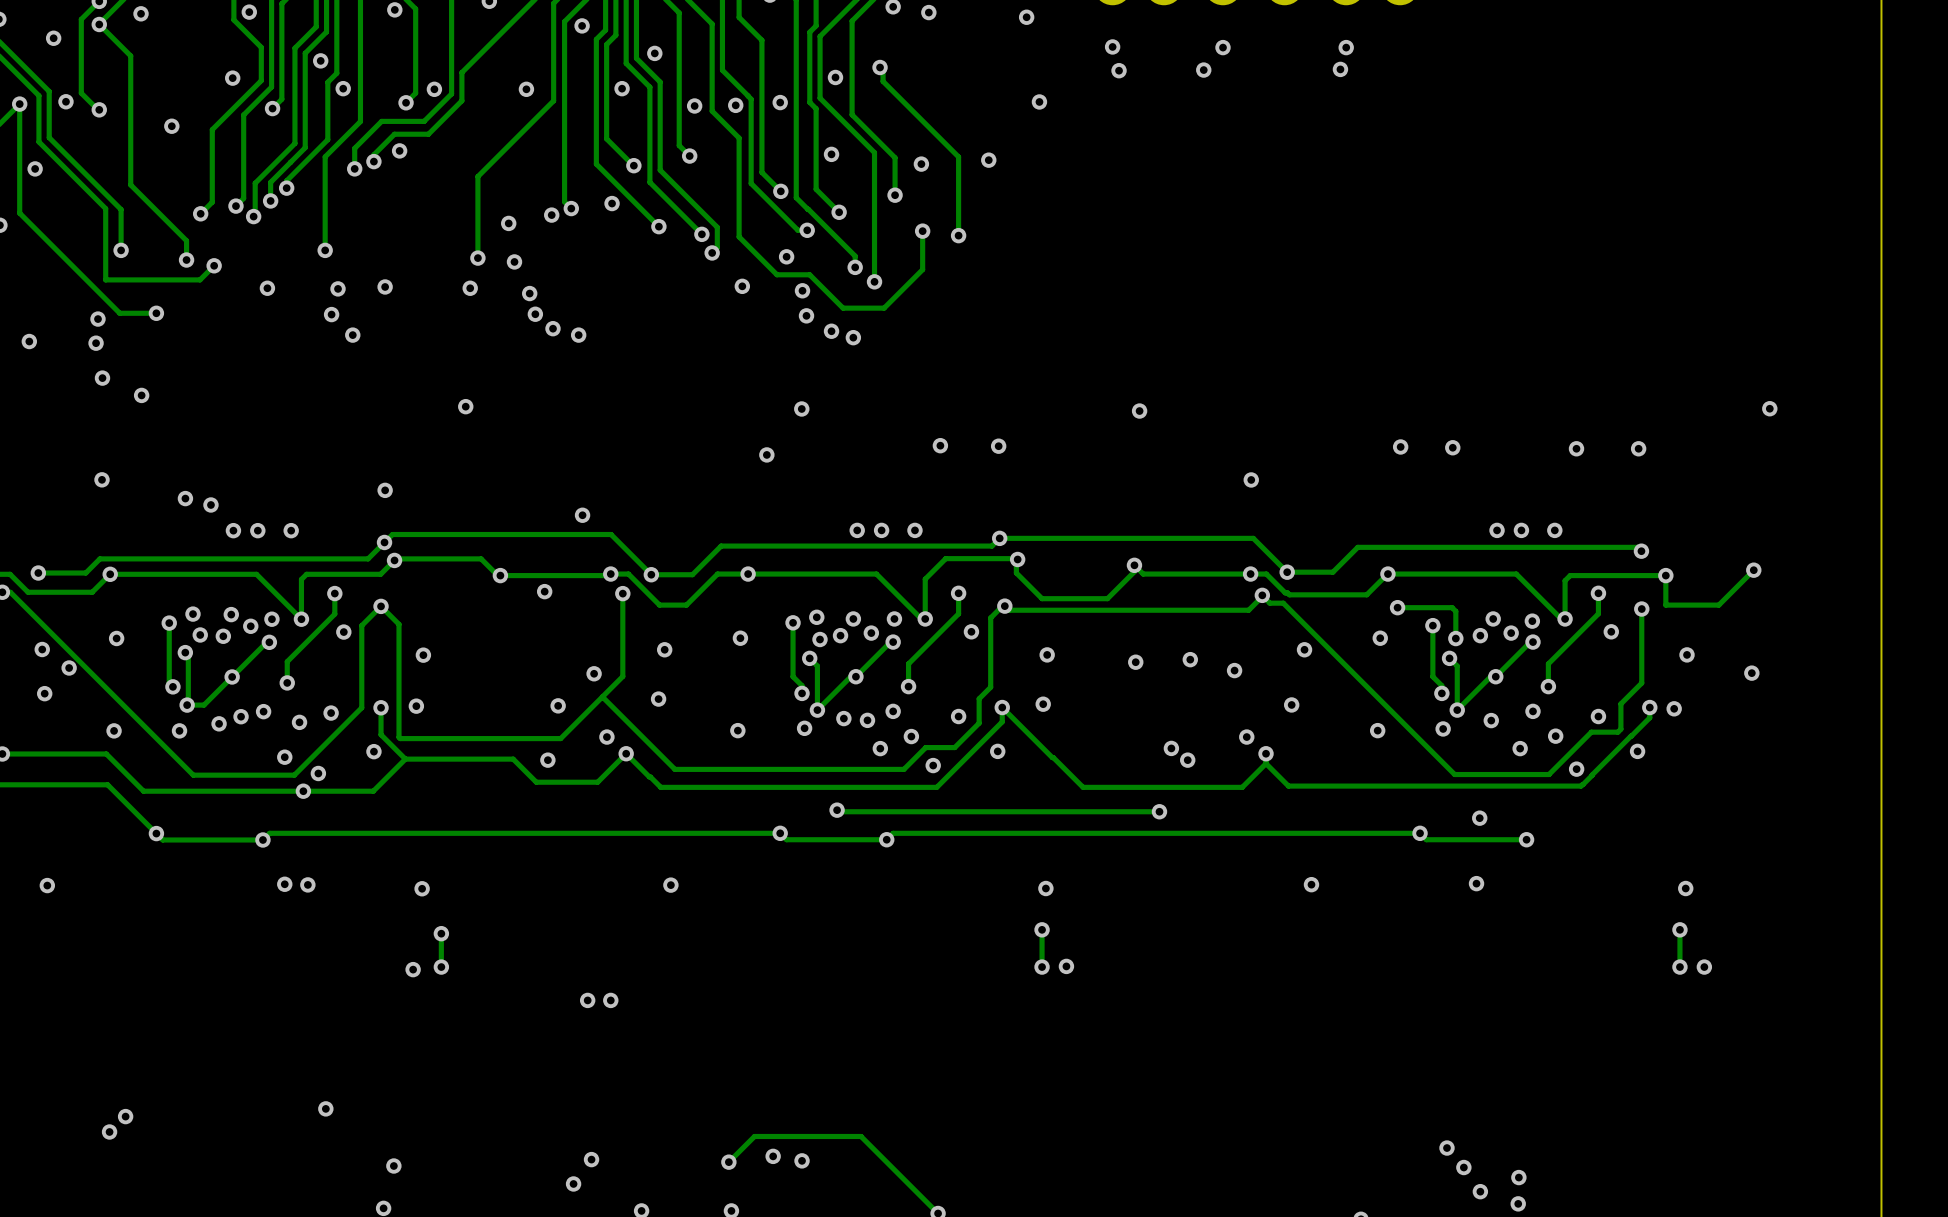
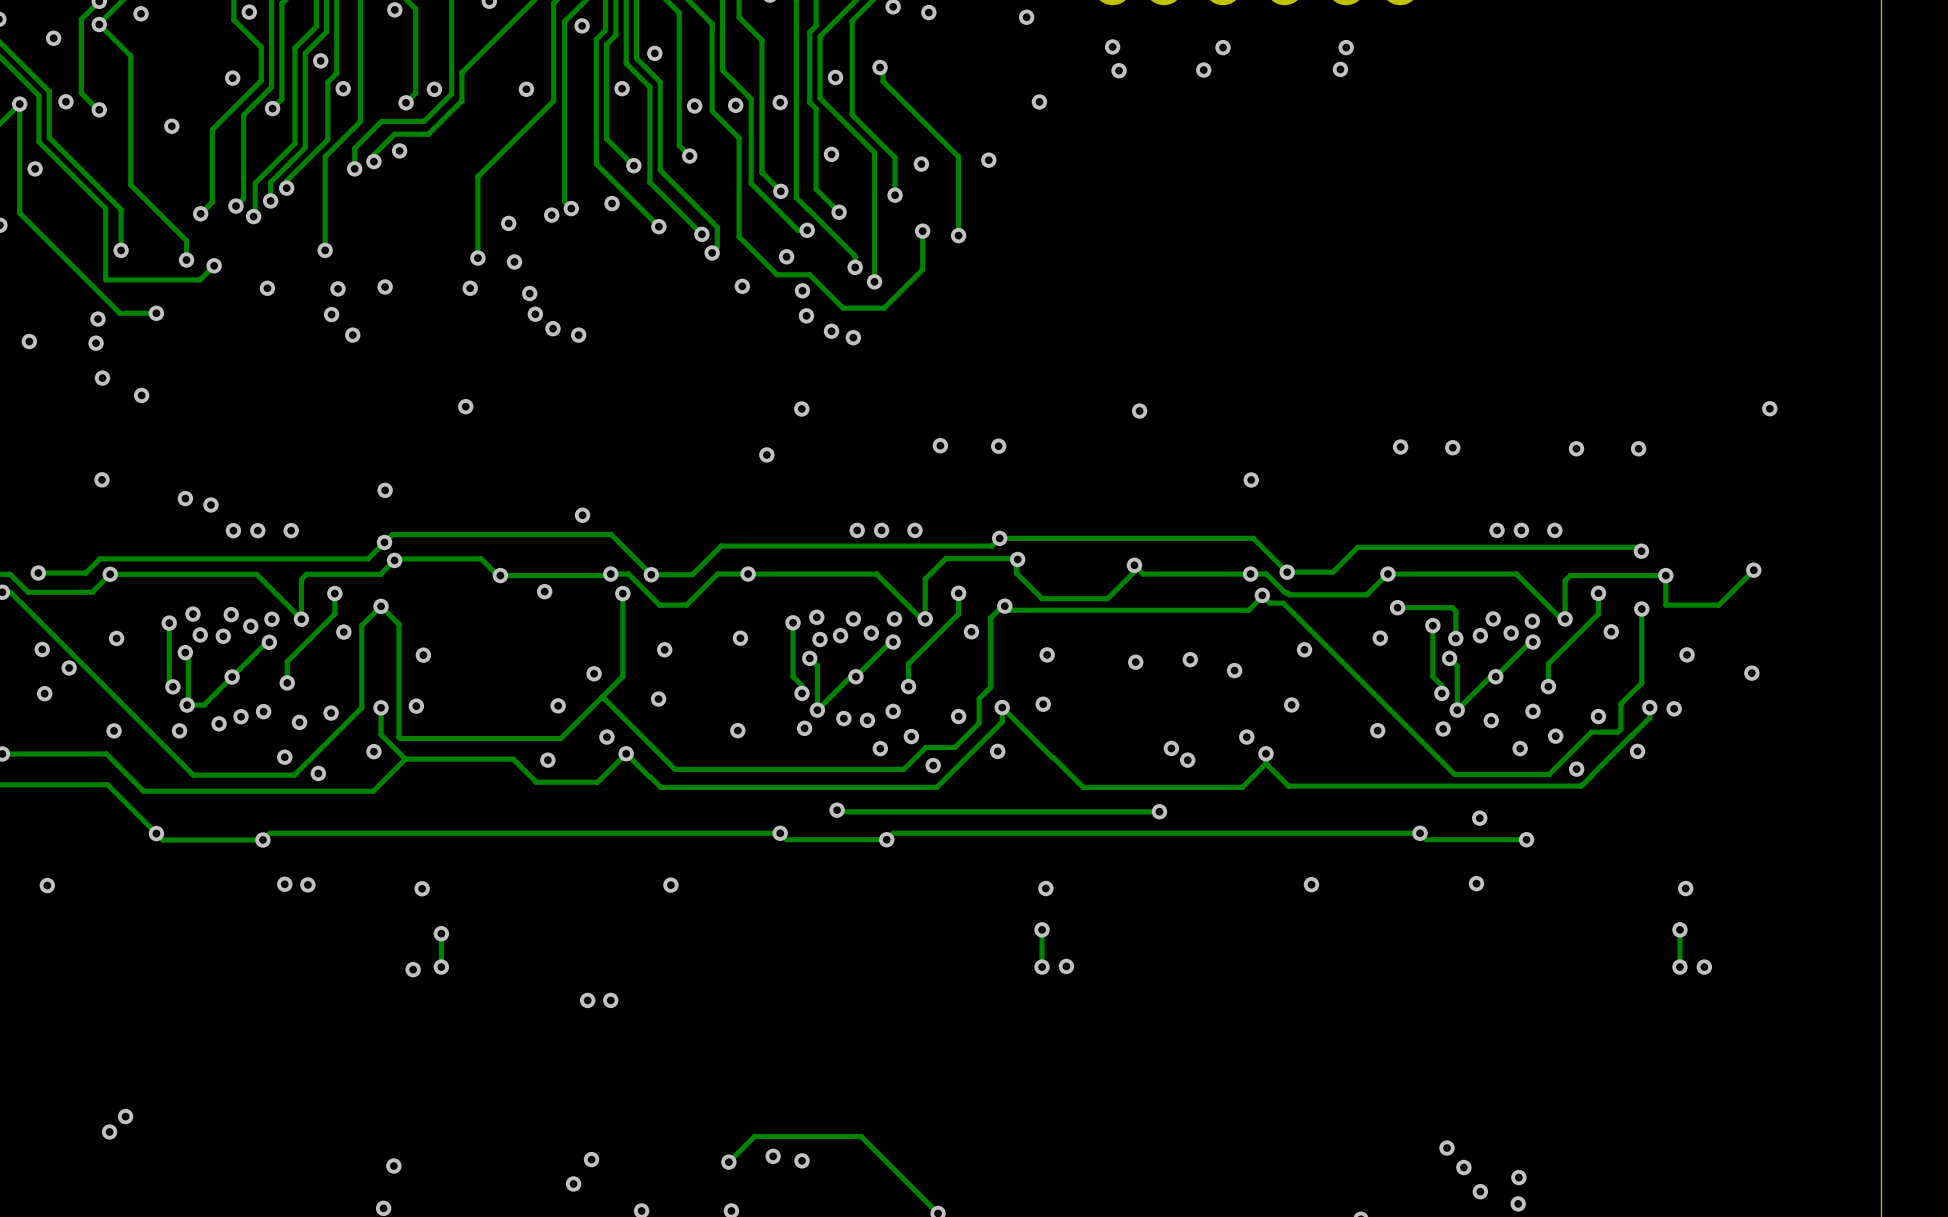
via: (303, 791) -> none
via: (325, 1108) -> none

